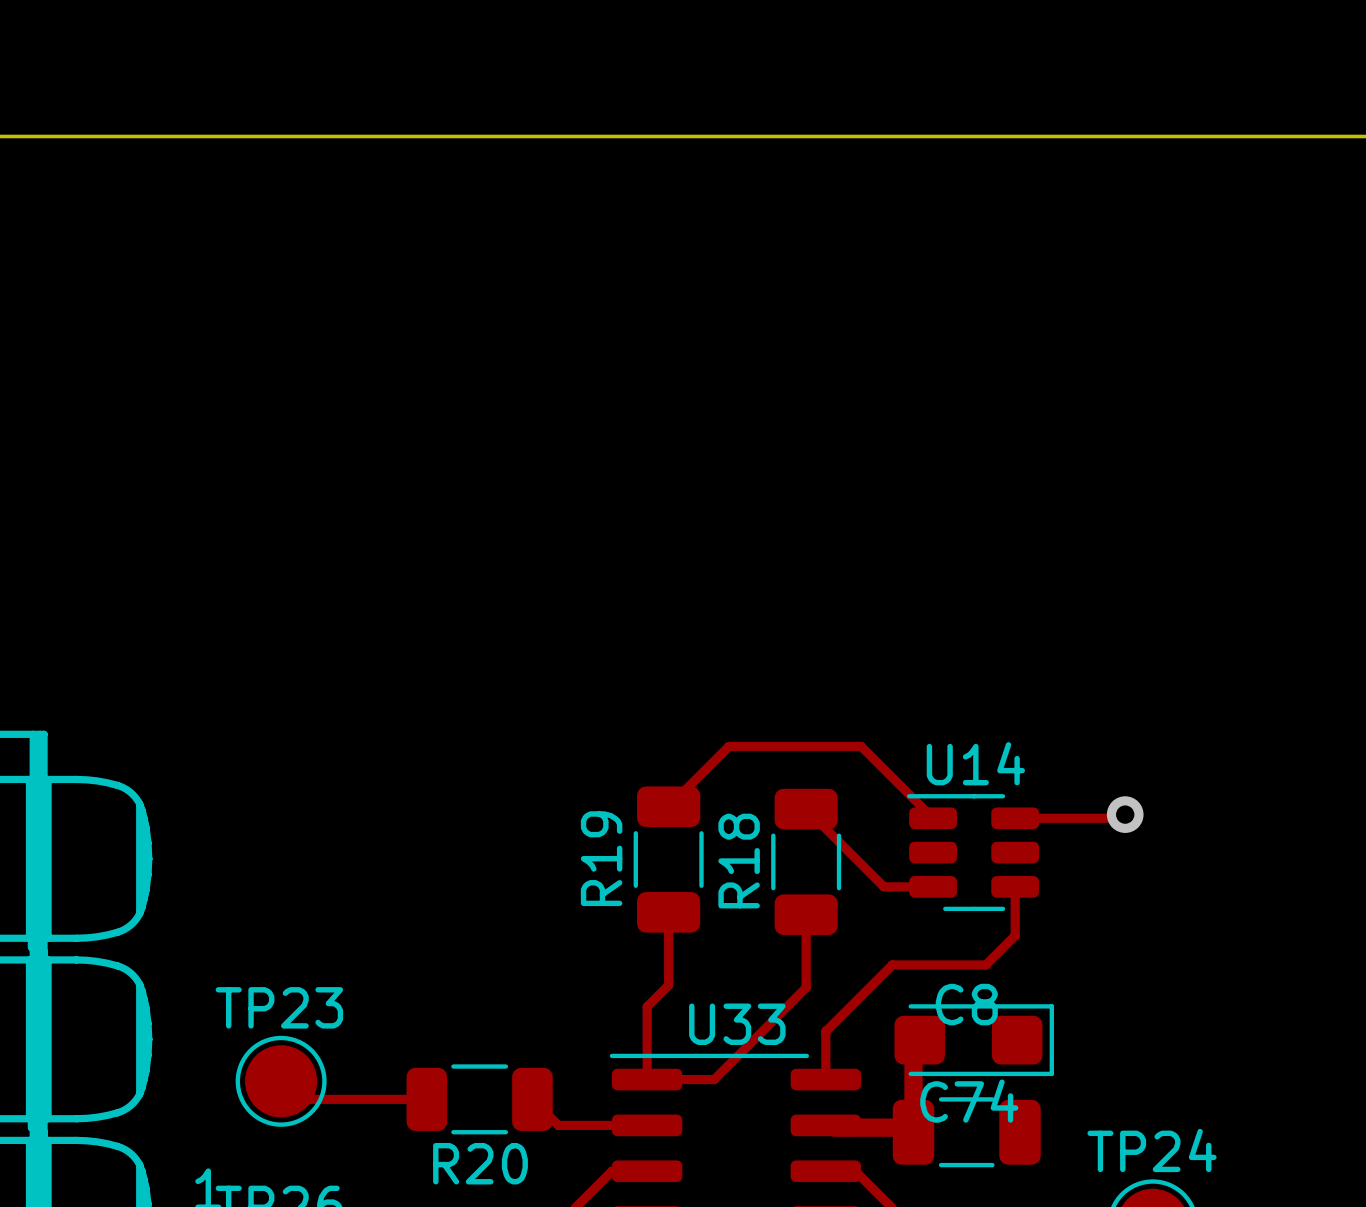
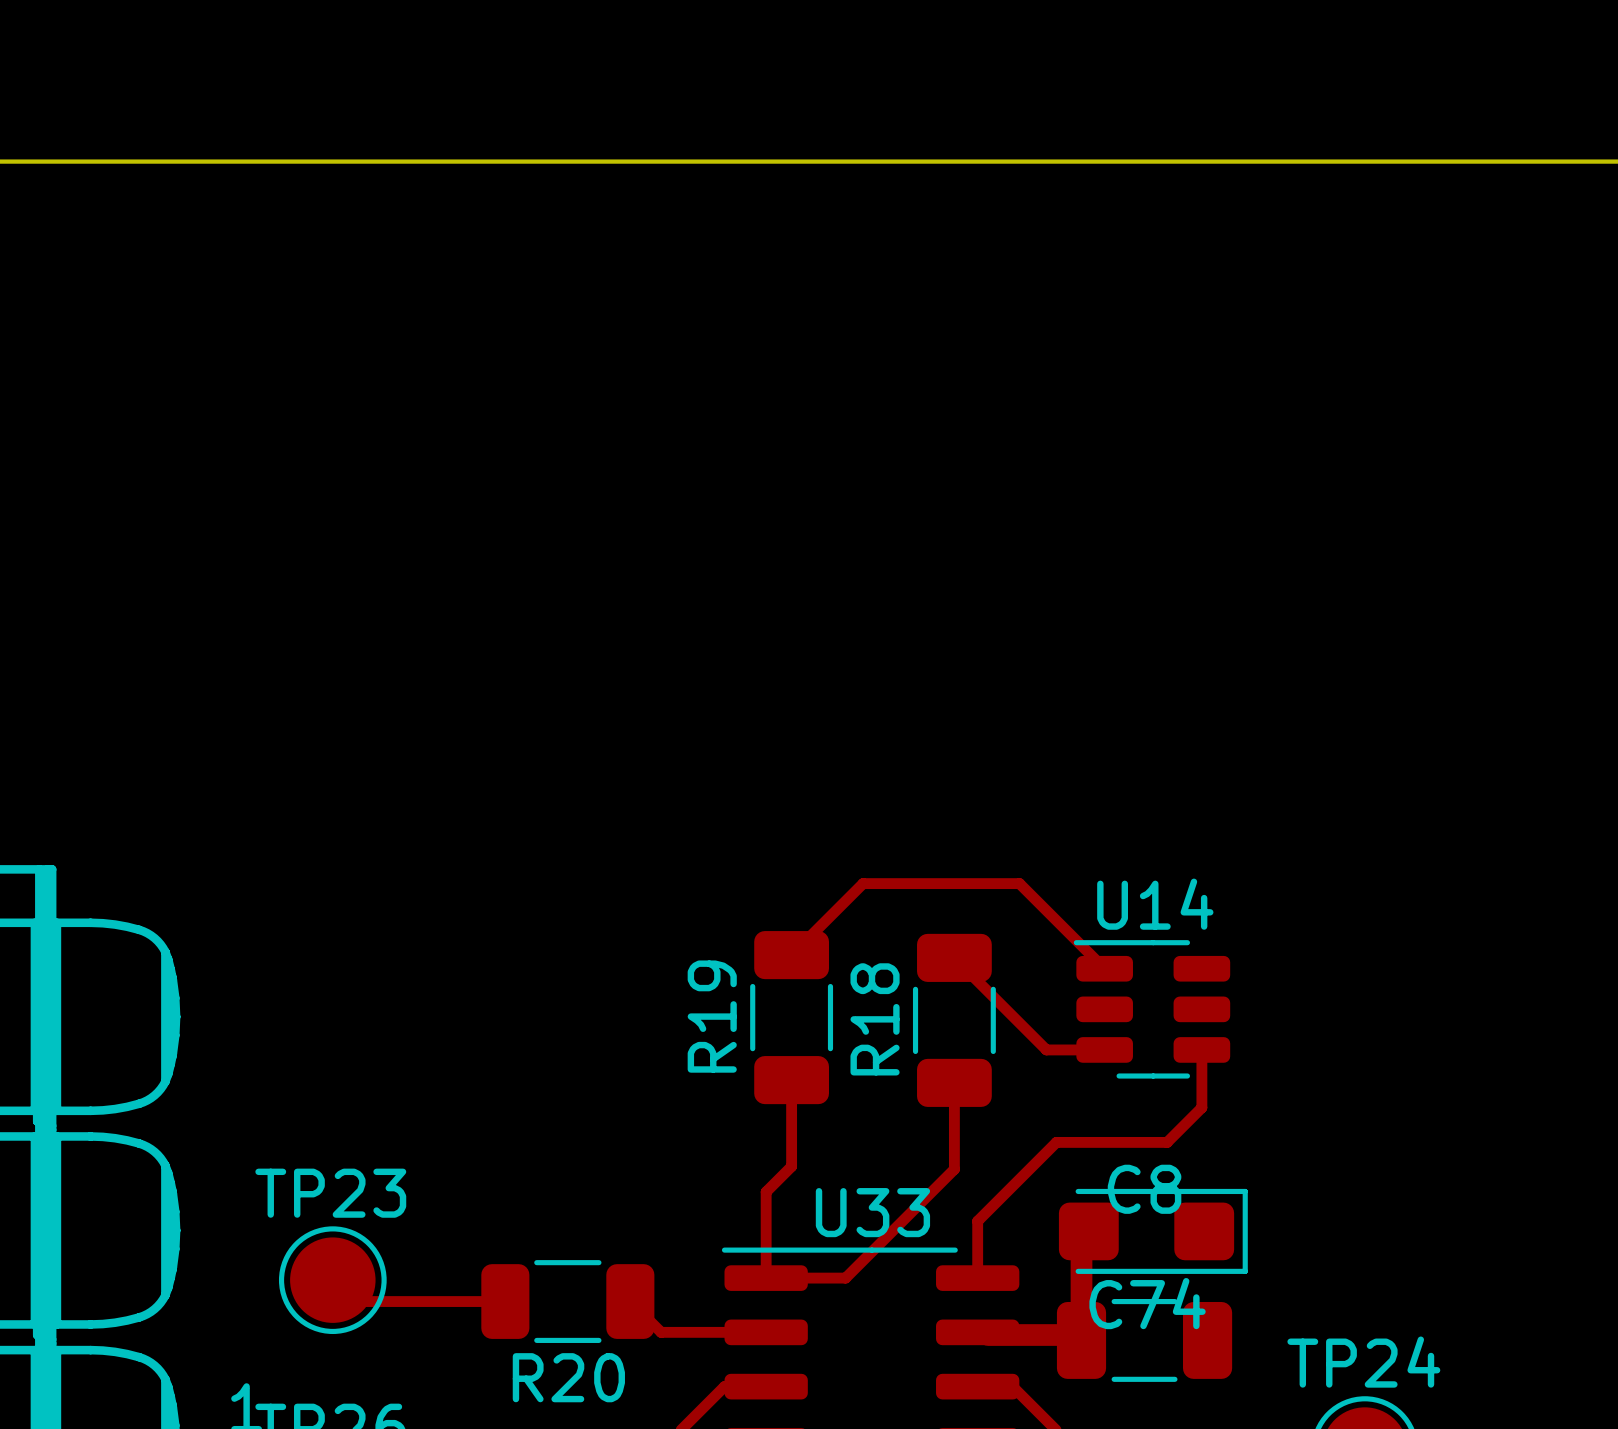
track: (1125, 814) (1121, 818) (1015, 818) -> none
via: (1125, 814) -> none

